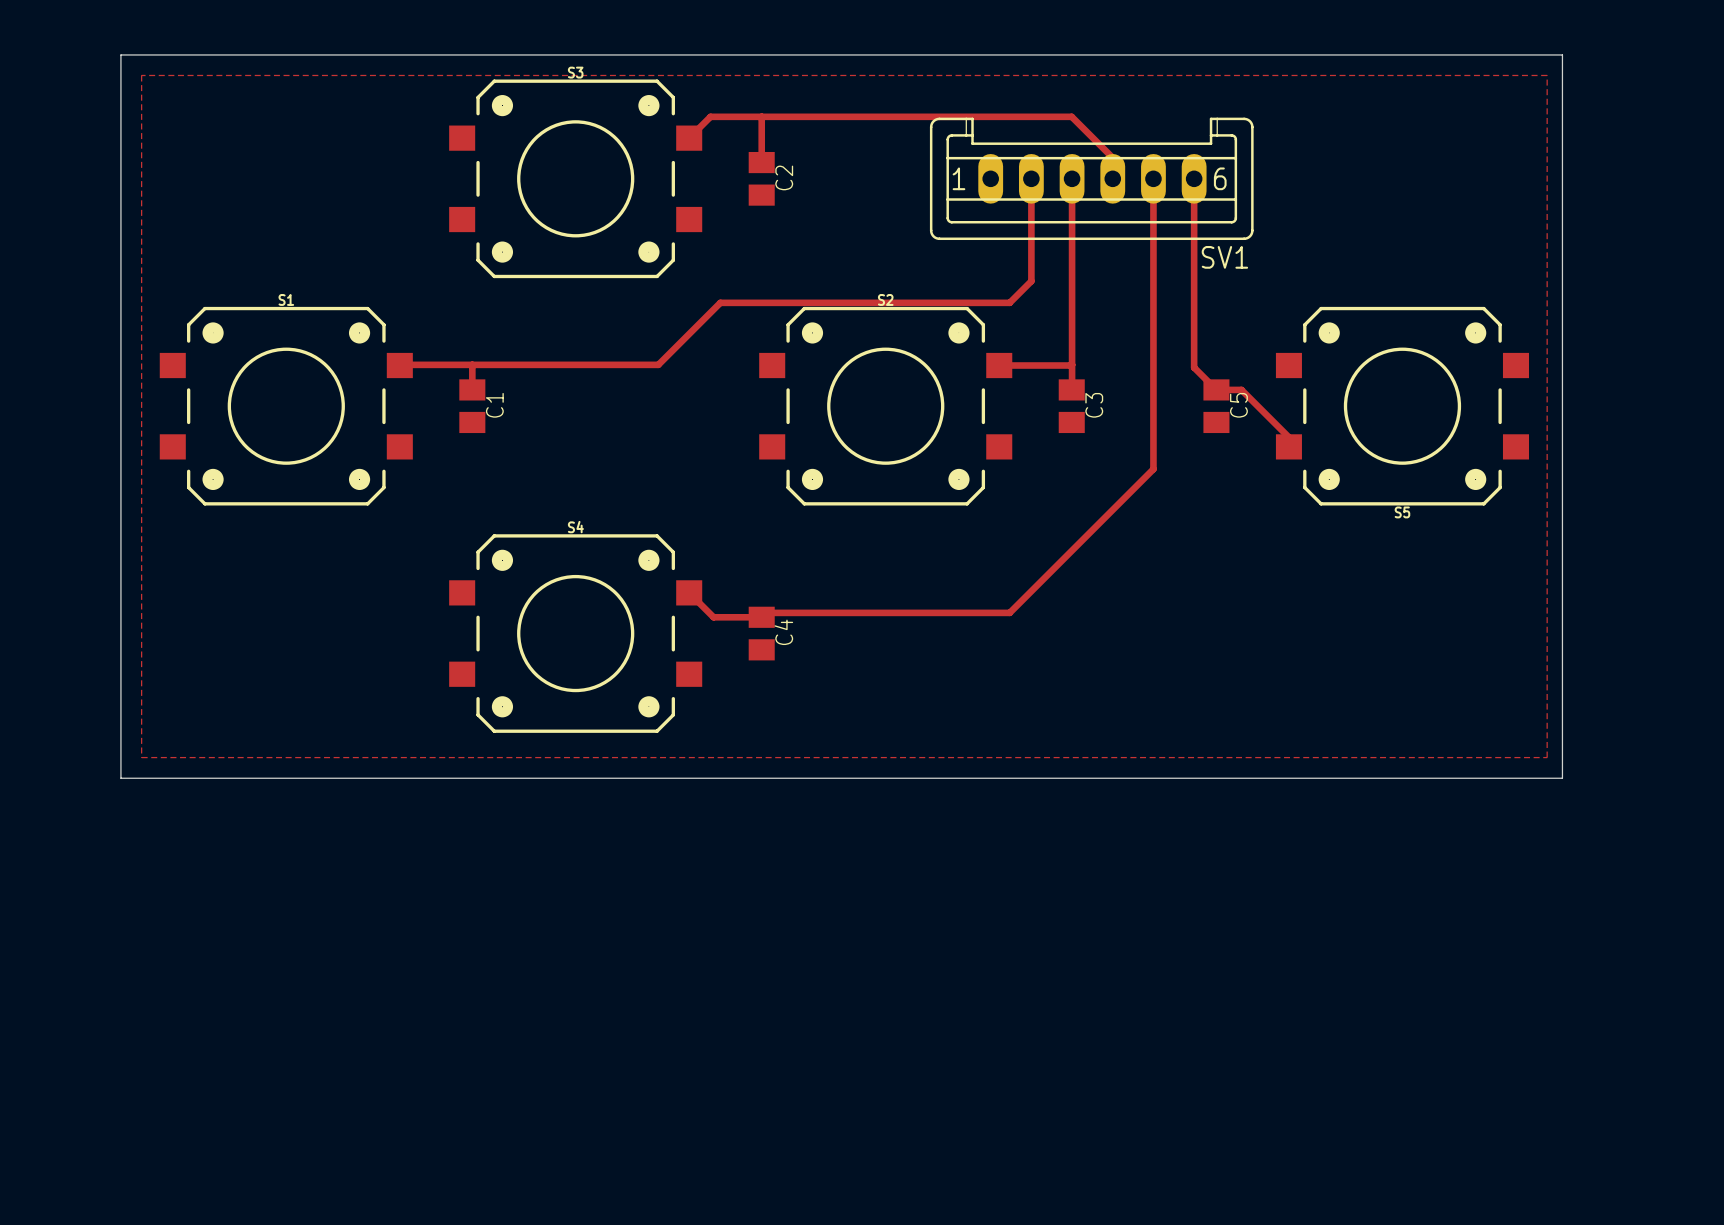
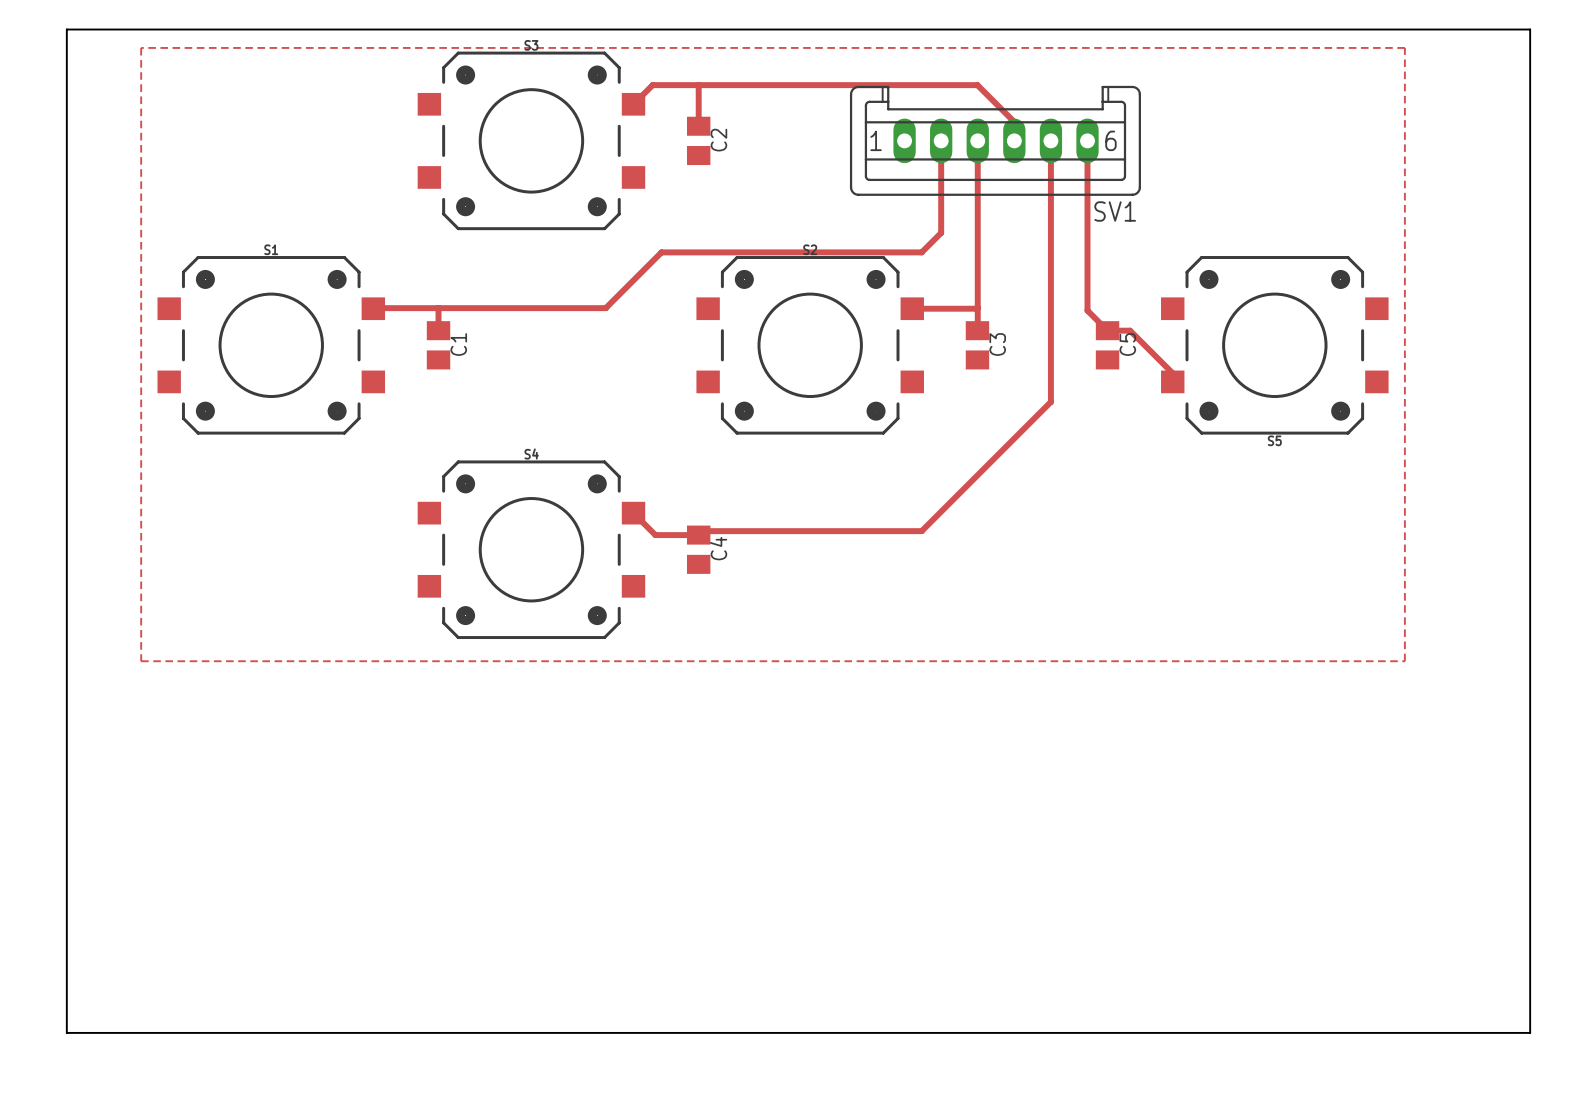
board edge: (120, 54) (120, 778) (1562, 778) (1562, 54) -> (122, 29) (66, 29) (66, 1032) (1530, 1032) (1530, 29) (1418, 29)

